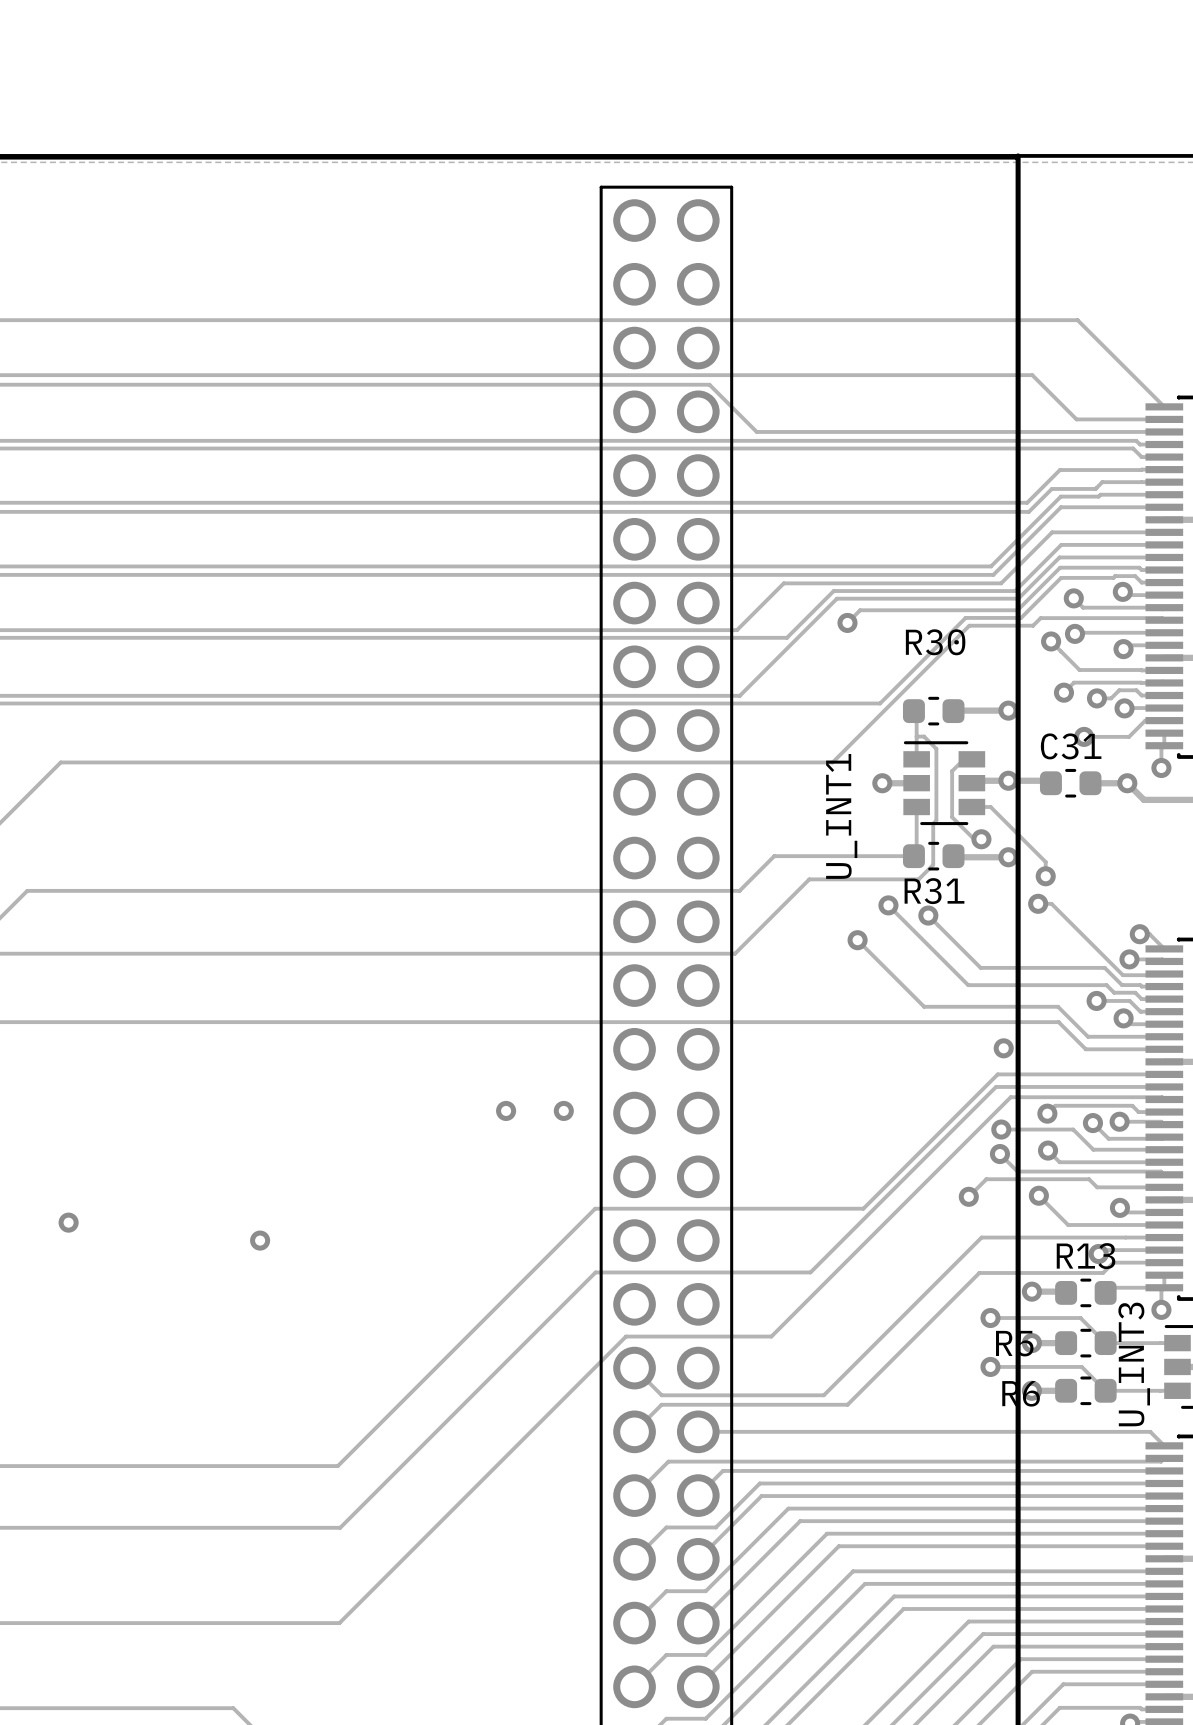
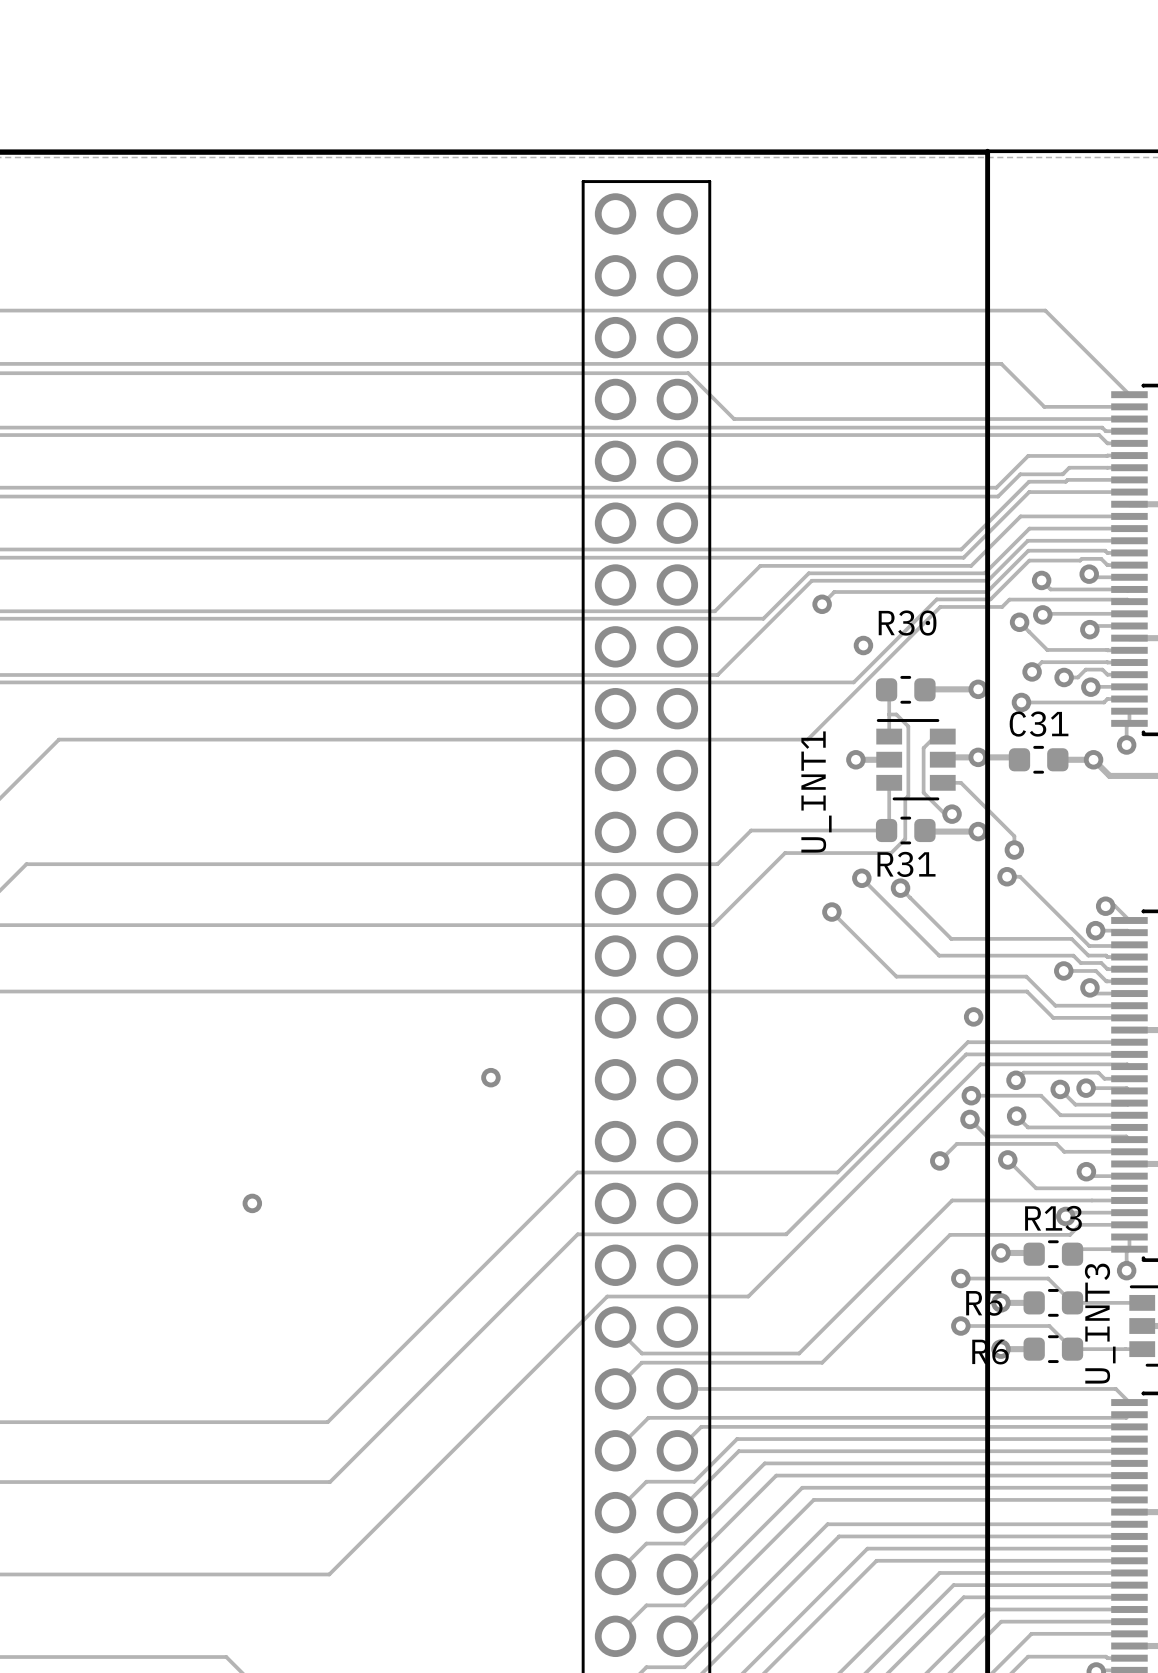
via: none -> (863, 645)
track: (1145, 720) (1129, 736) (1084, 736) -> (1111, 699) (1107, 699) (1104, 702) (1021, 702)
via position: (1084, 736) -> (1021, 702)
via: (563, 1110) -> none
via: (68, 1222) -> none

